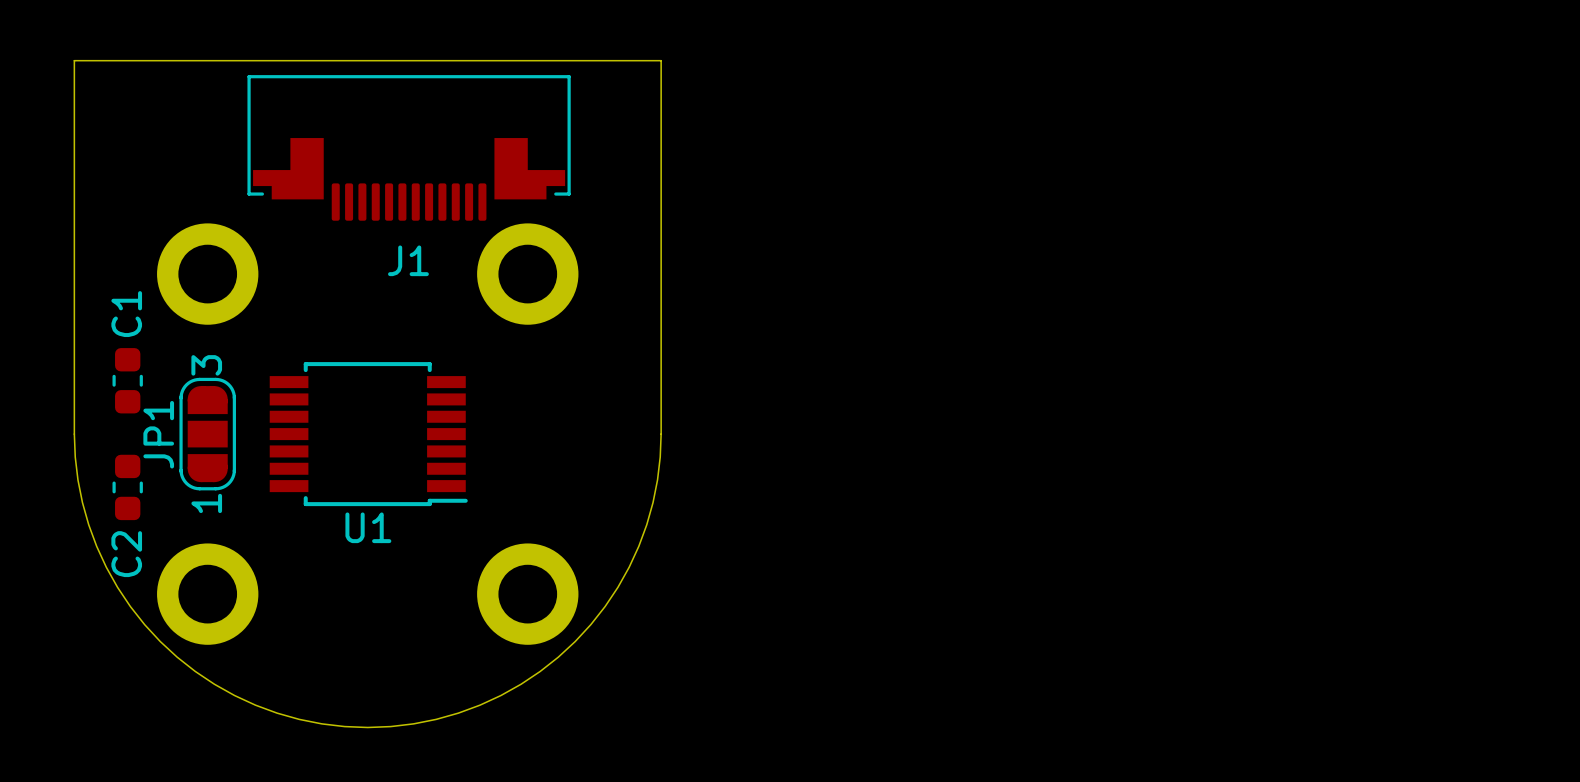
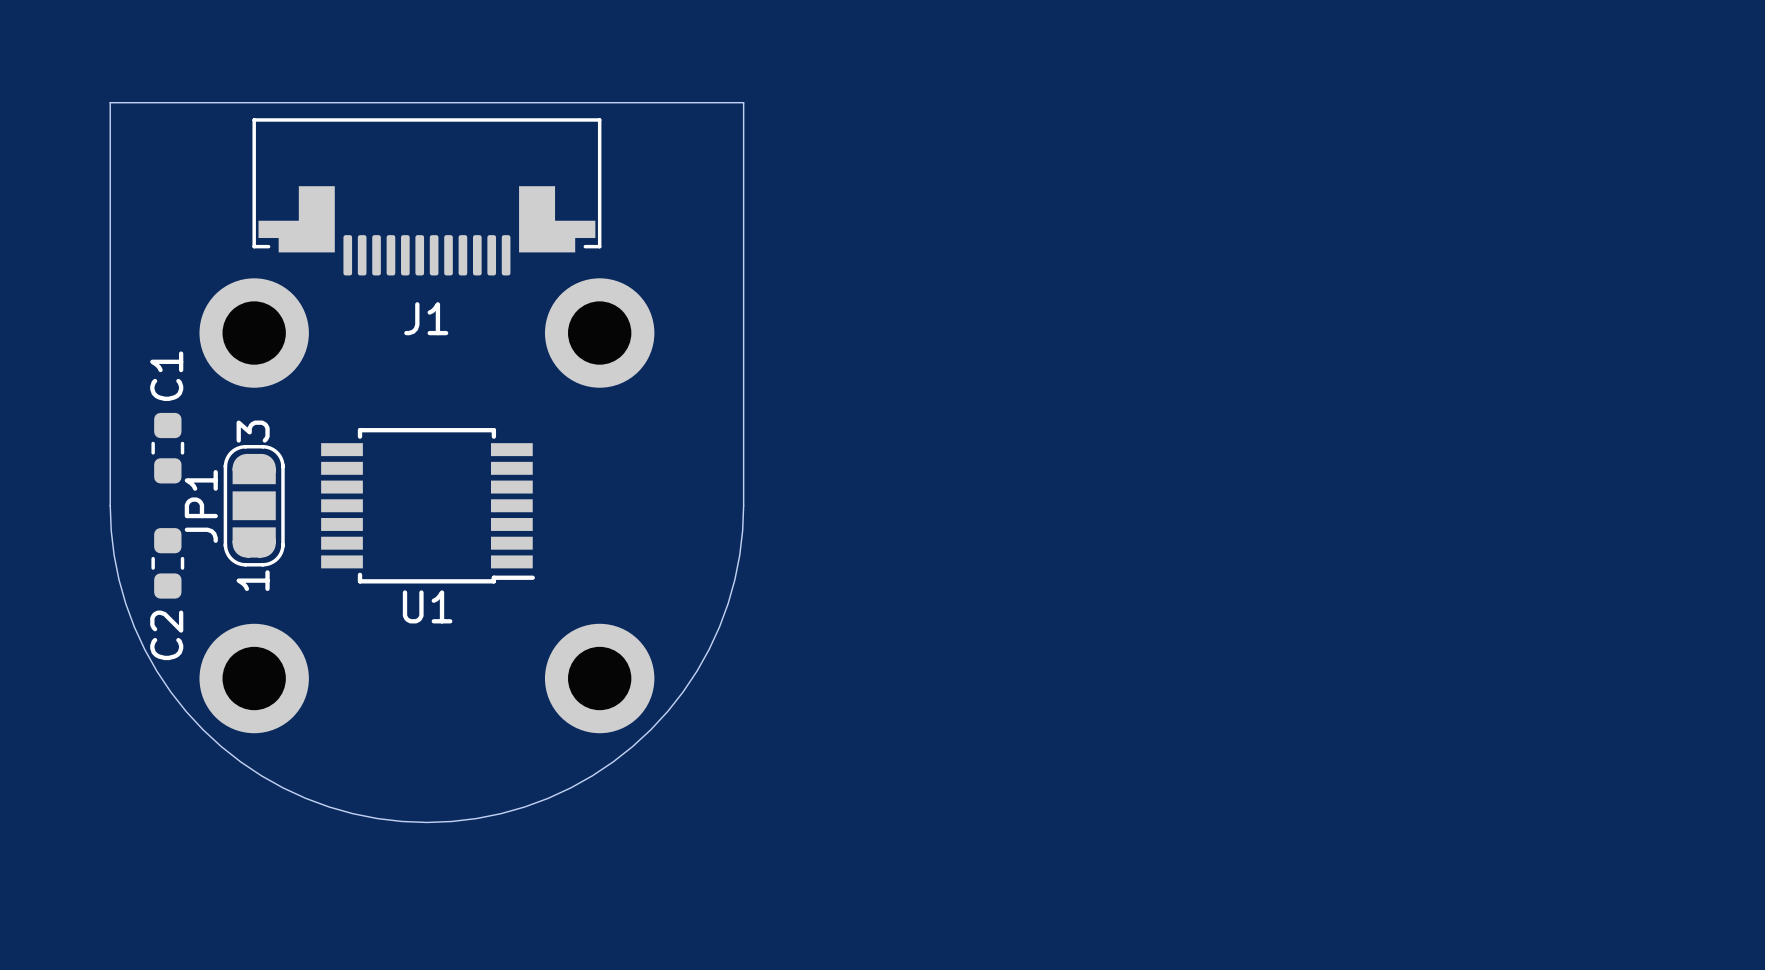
J1 position: (409, 147) -> (426, 196)

